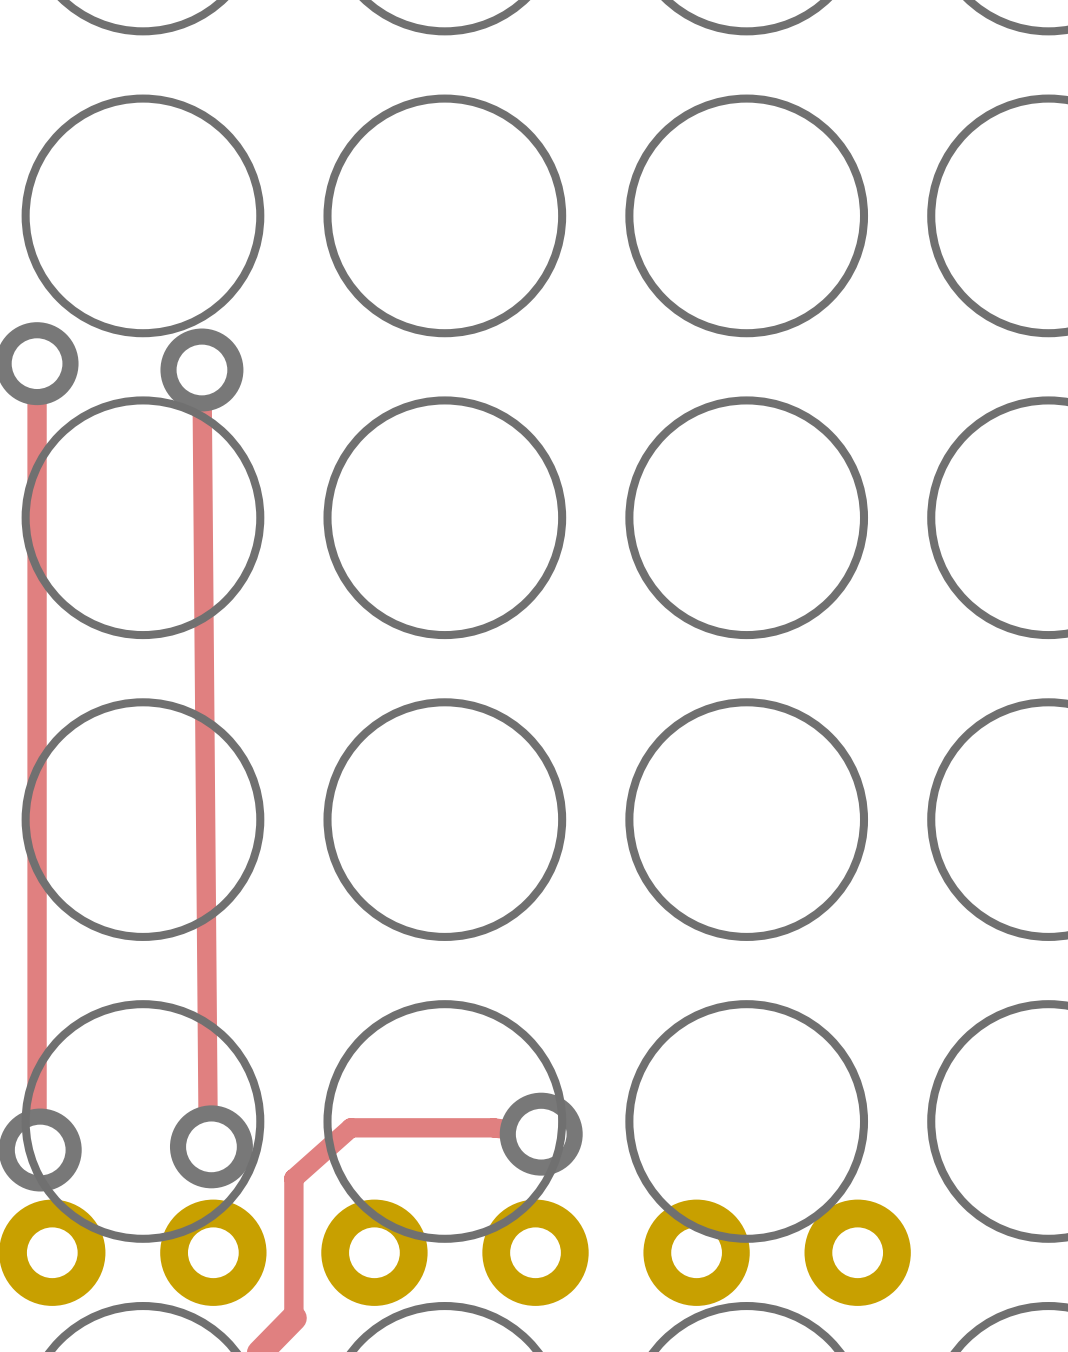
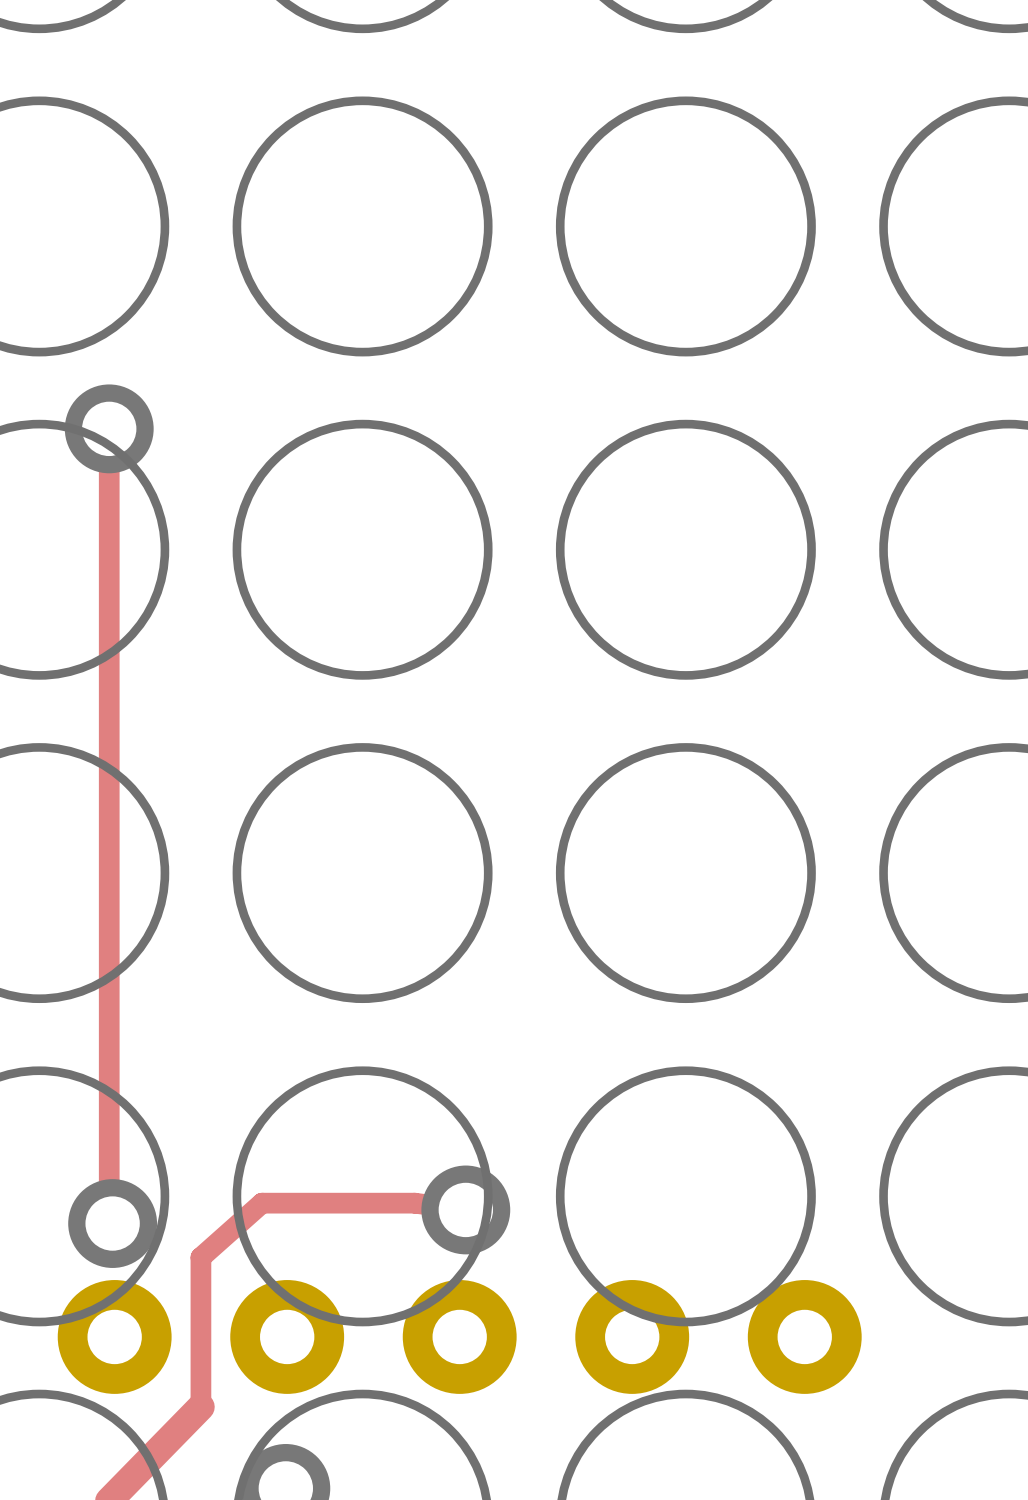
track: (201, 369) (208, 1143) -> (109, 428) (109, 1220)
via position: (201, 369) -> (109, 428)

